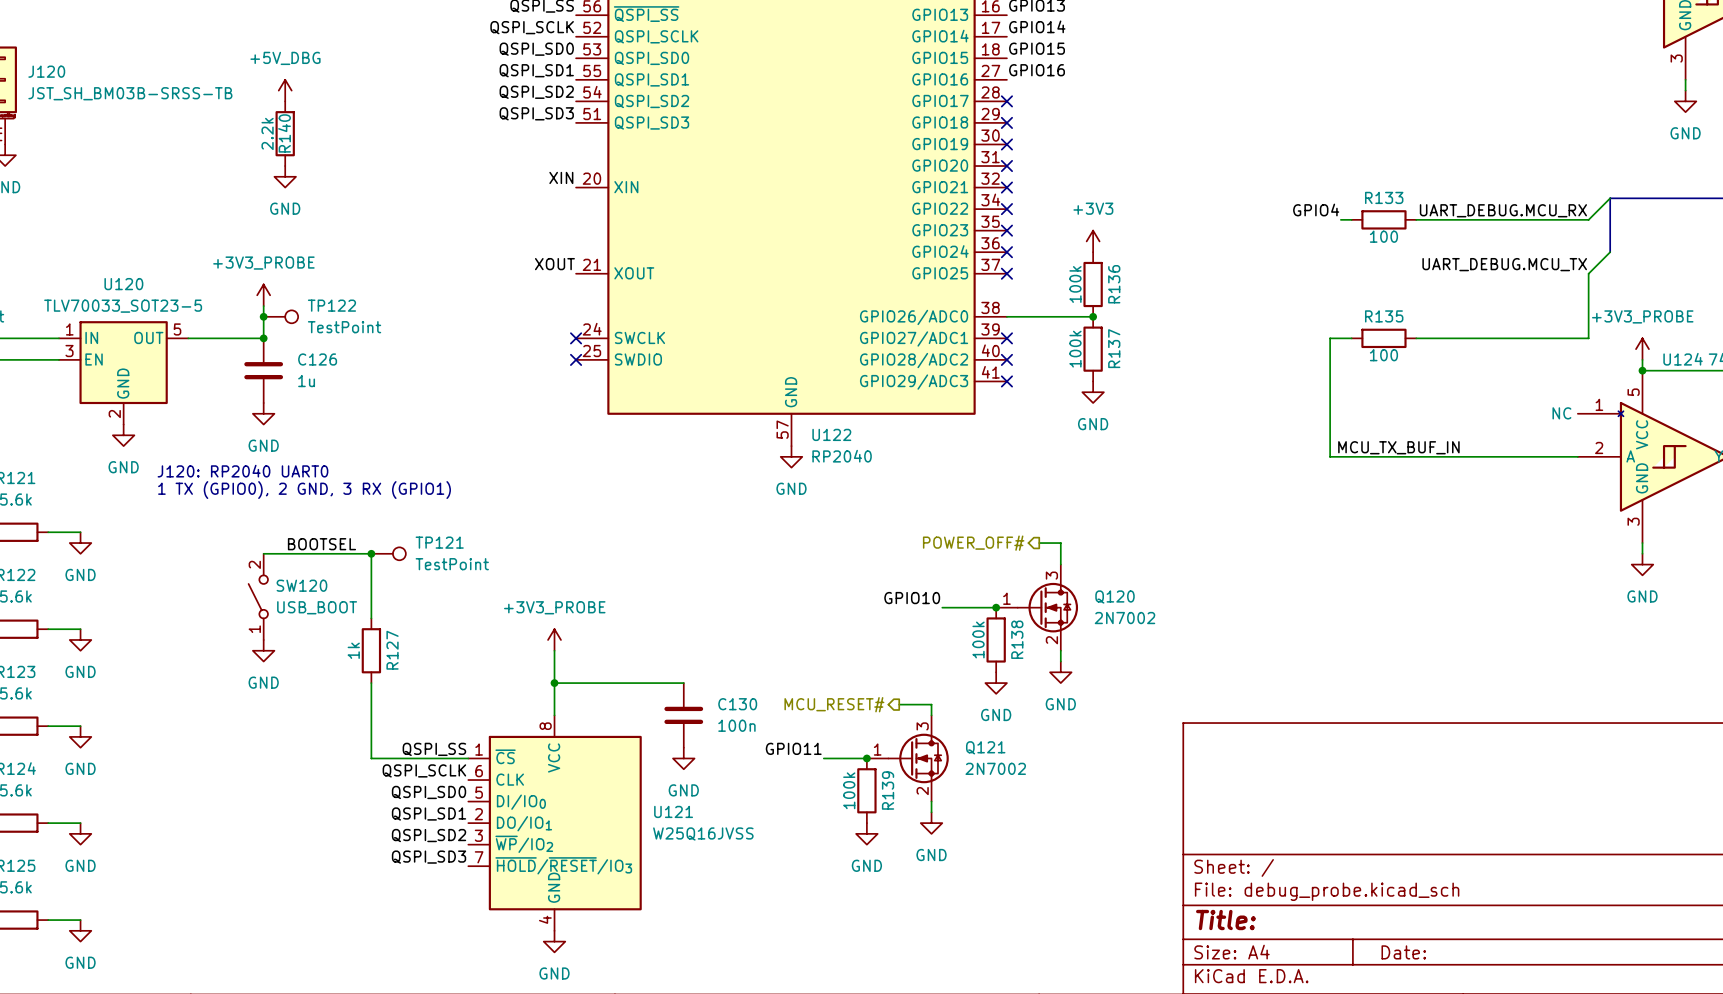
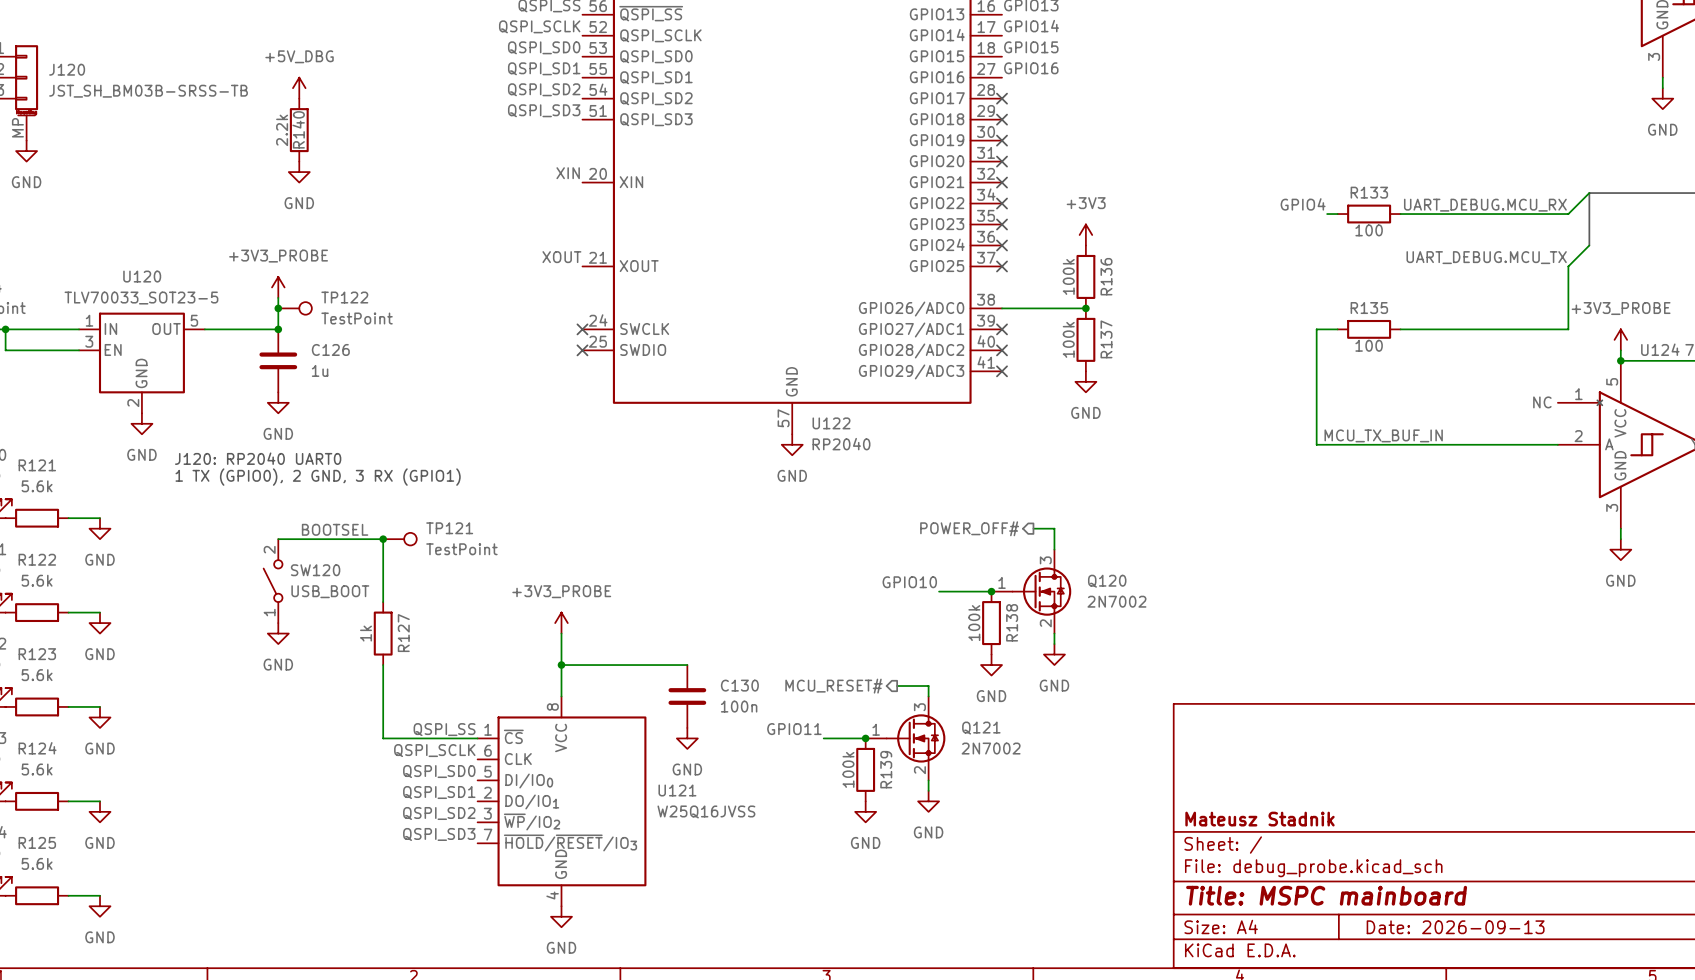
title block: none -> Mateusz Stadnik (1259, 819)
title block: Title: (1225, 920) -> Title: MSPC mainboard (1326, 895)
title block: Date: (1403, 952) -> Date: 2026-09-13 (1455, 927)

